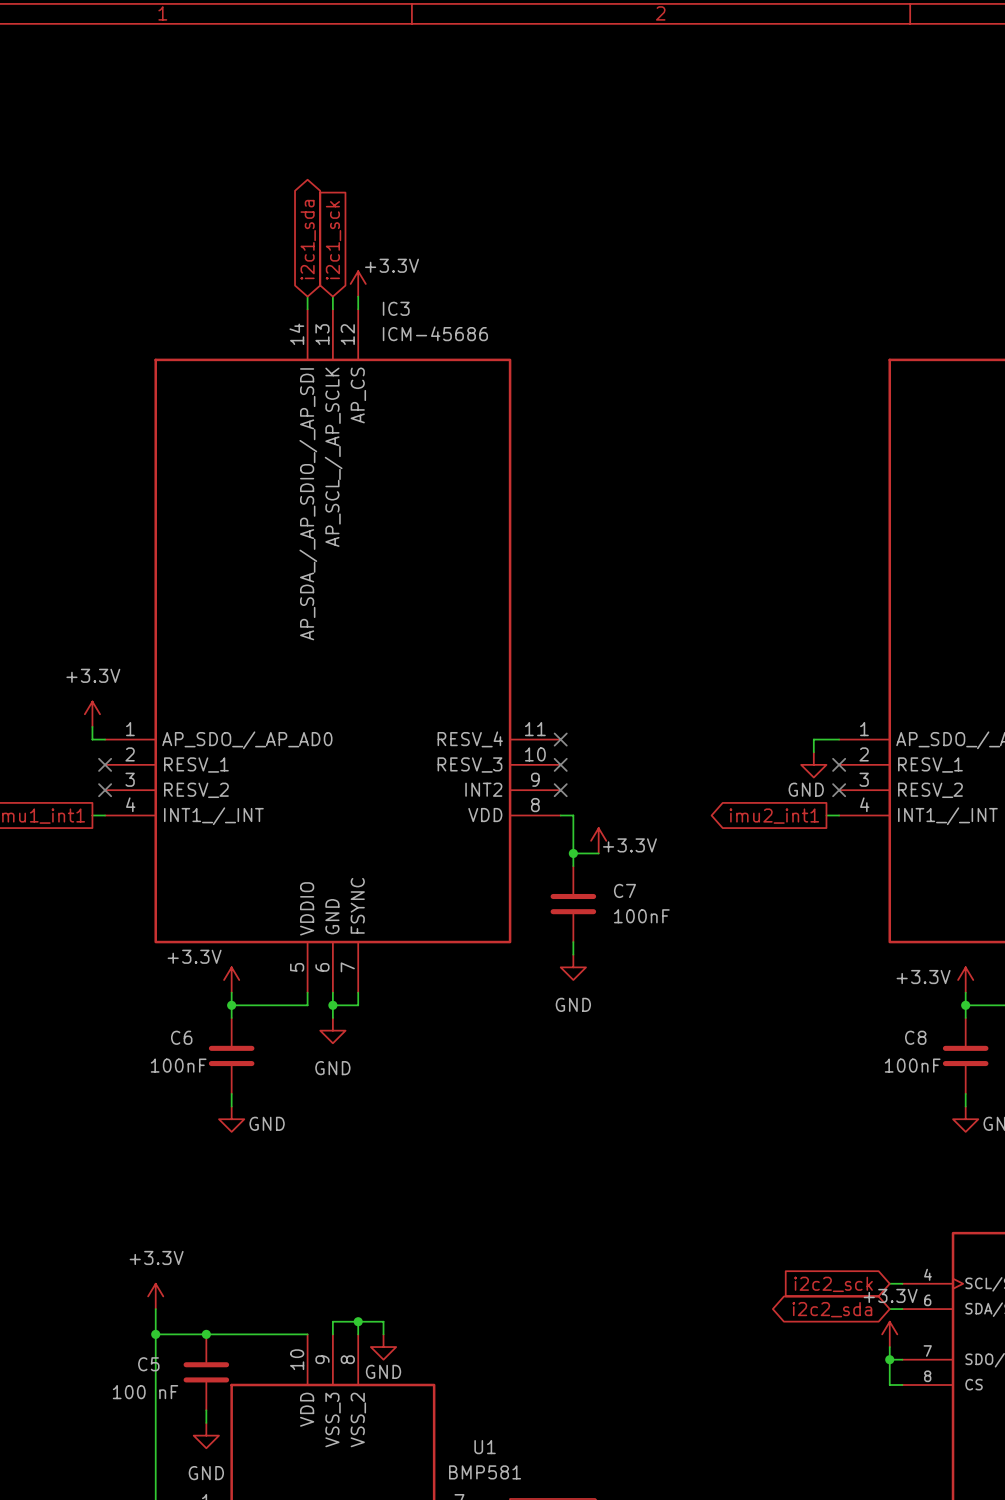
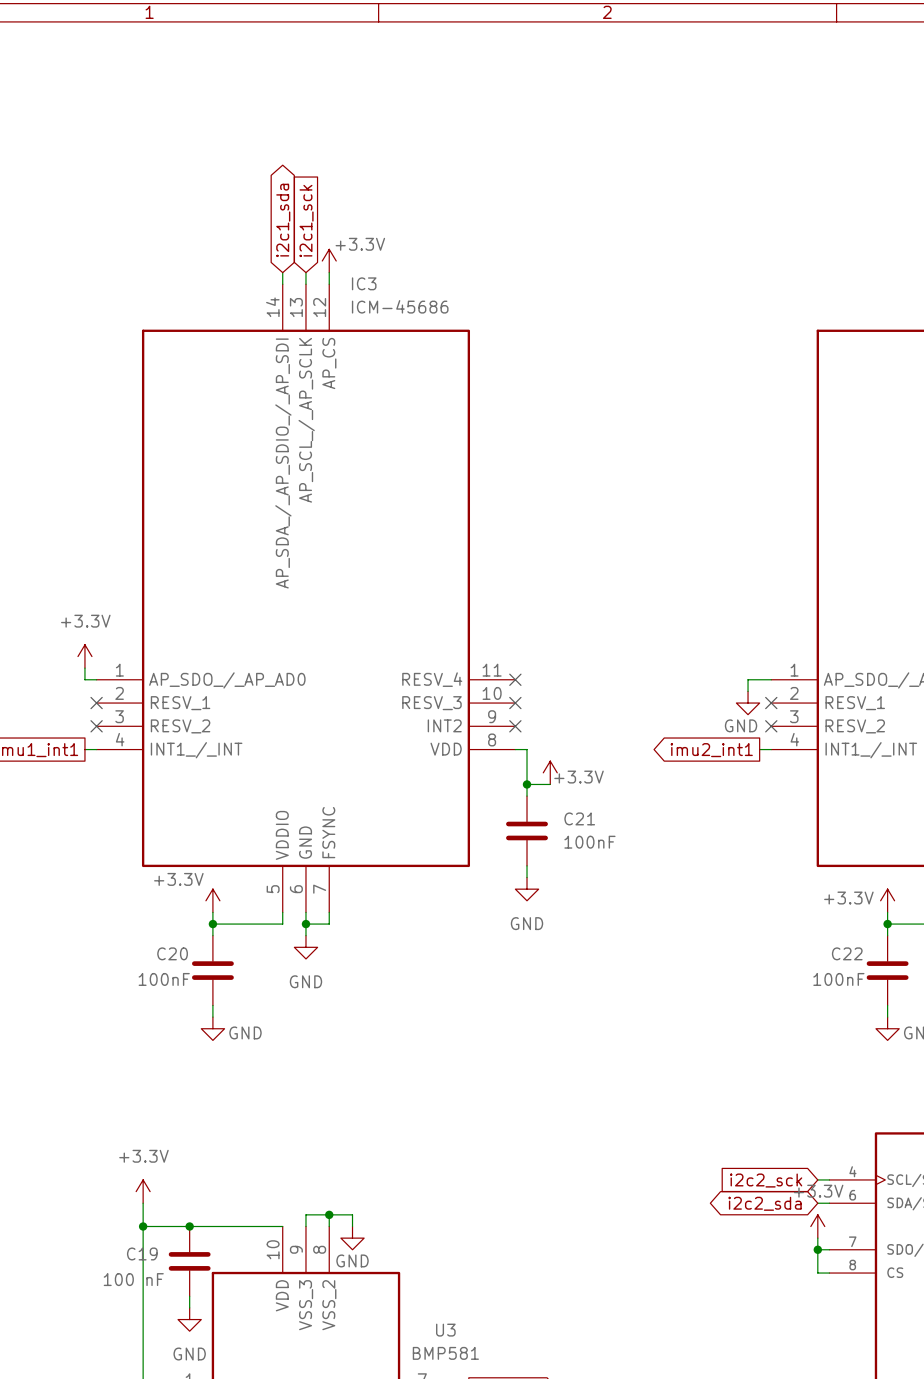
C7 name: C7 (624, 890) -> C21 (579, 818)
C6 name: C6 (181, 1037) -> C20 (172, 953)
C8 name: C8 (915, 1037) -> C22 (847, 953)
C5 name: C5 (148, 1364) -> C19 (142, 1253)
U1 name: U1 (485, 1447) -> U3 (445, 1330)

